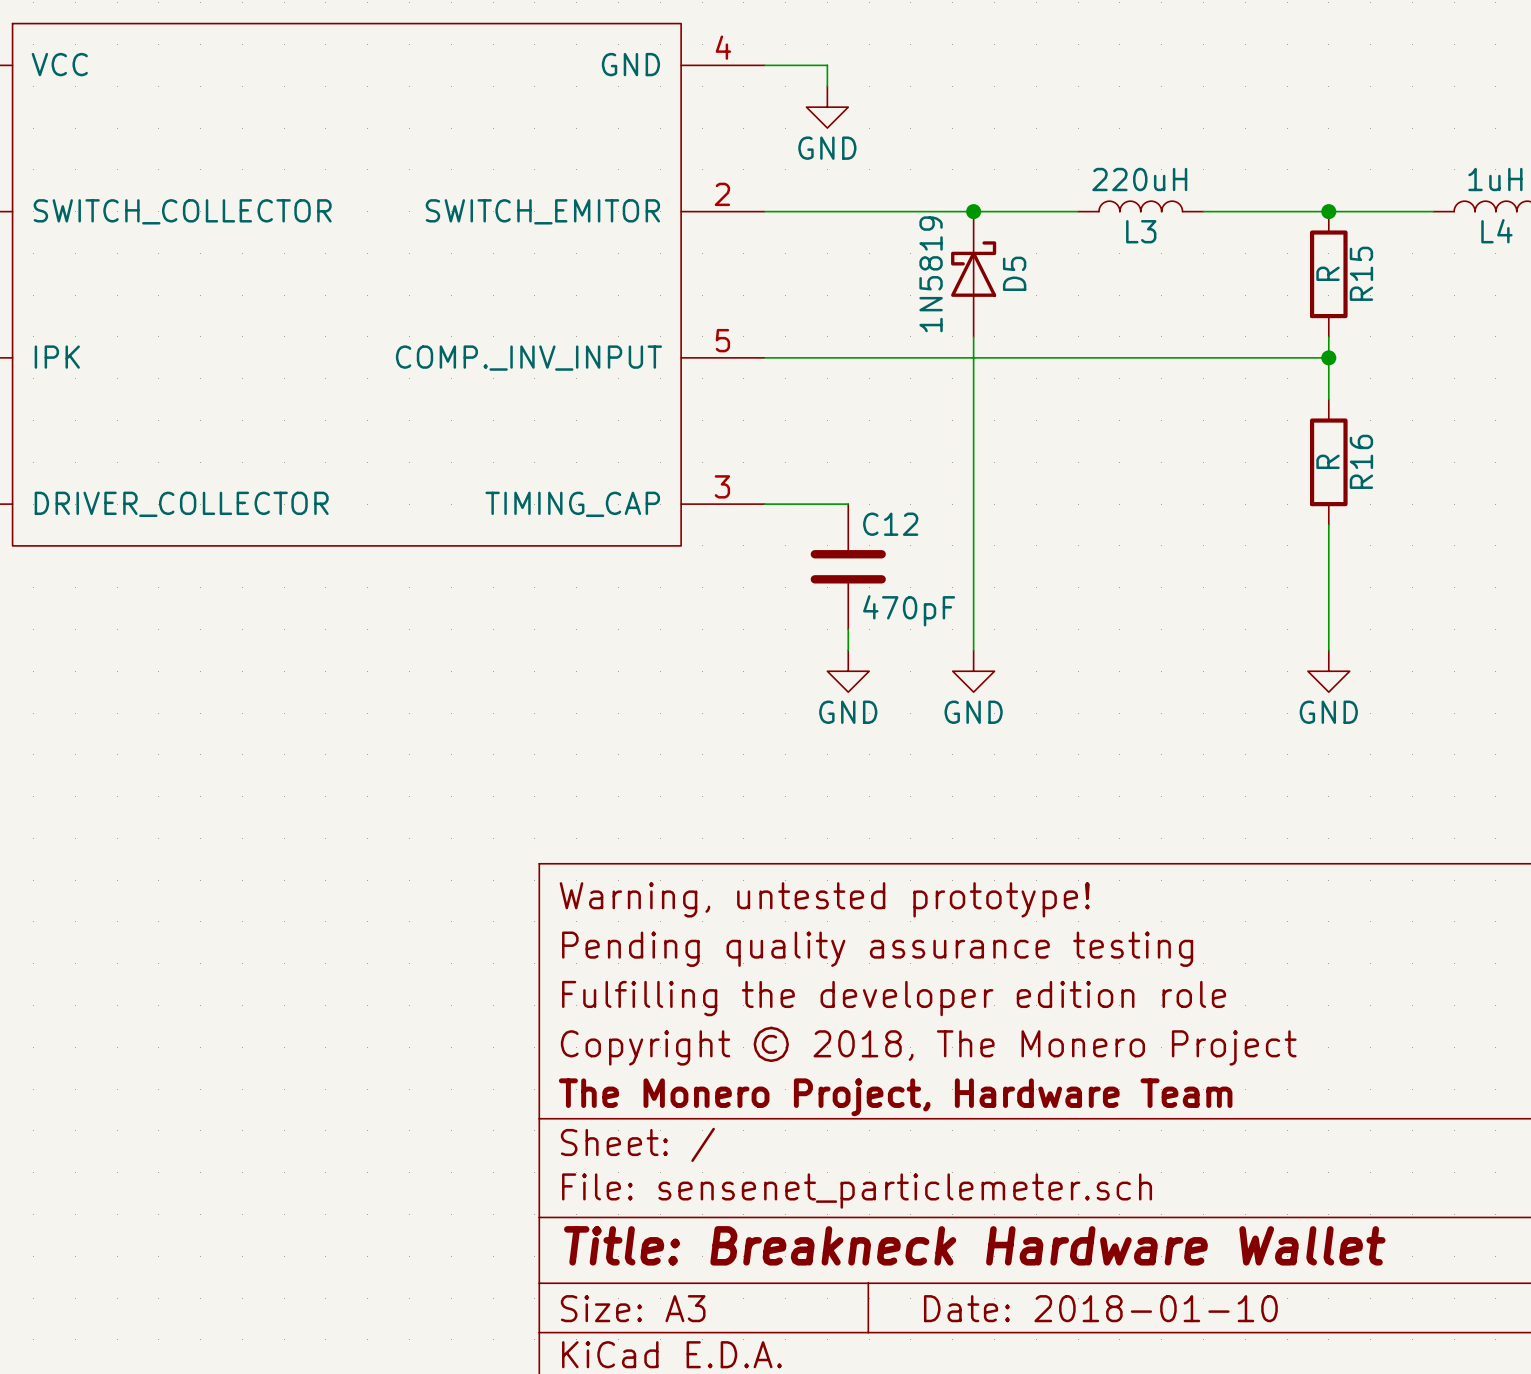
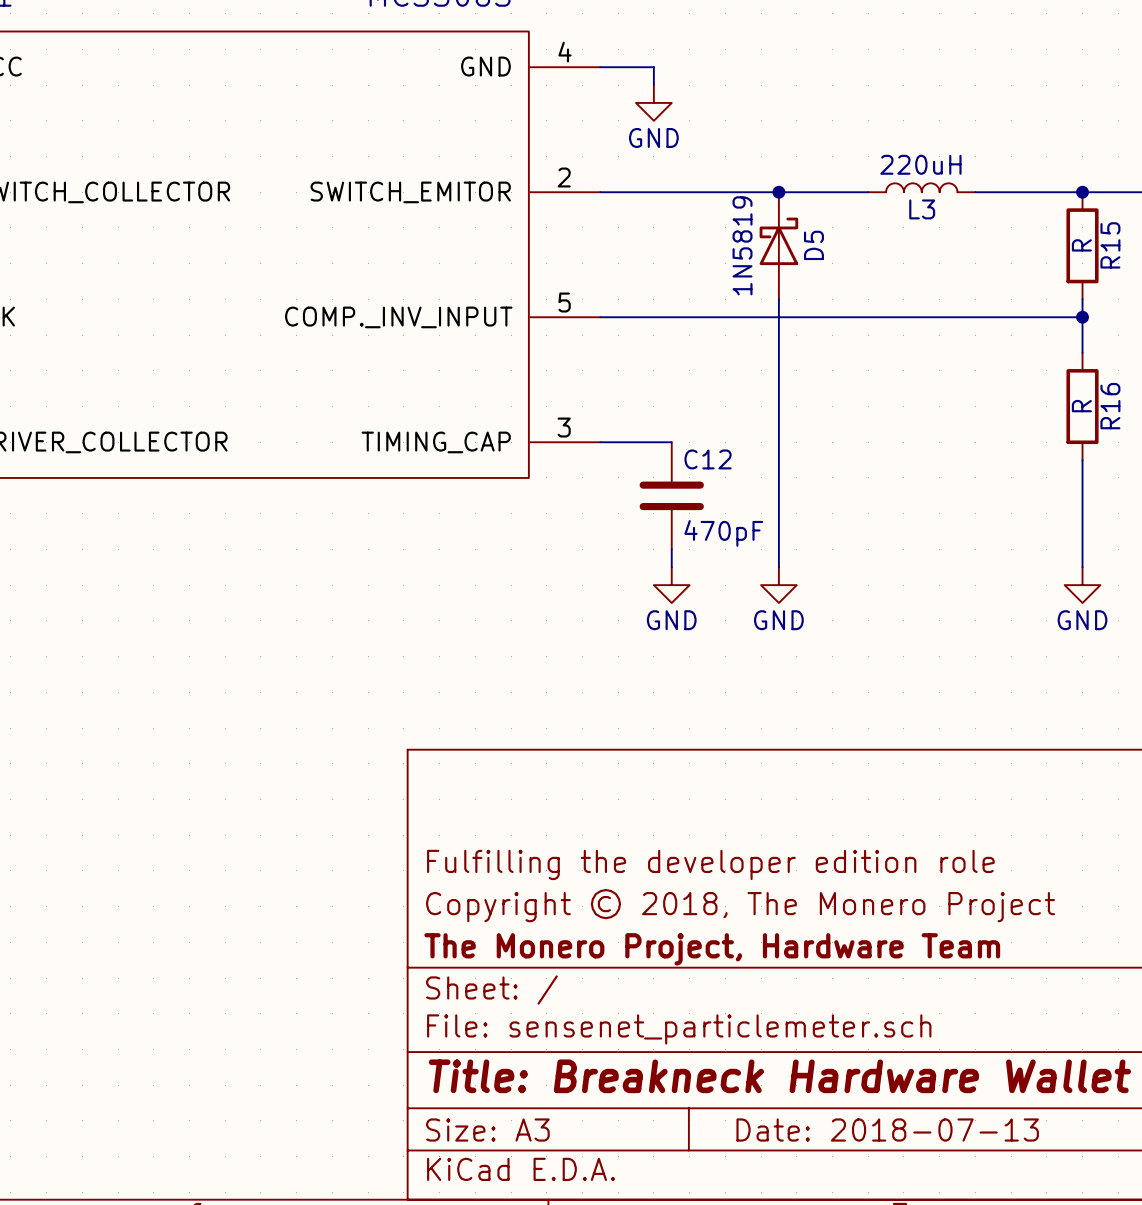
title block: Warning, untested prototype! (824, 899) -> none
title block: Pending quality assurance testing (877, 949) -> none
title block: Date: 2018-01-10 (1100, 1308) -> Date: 2018-07-13 (887, 1130)

